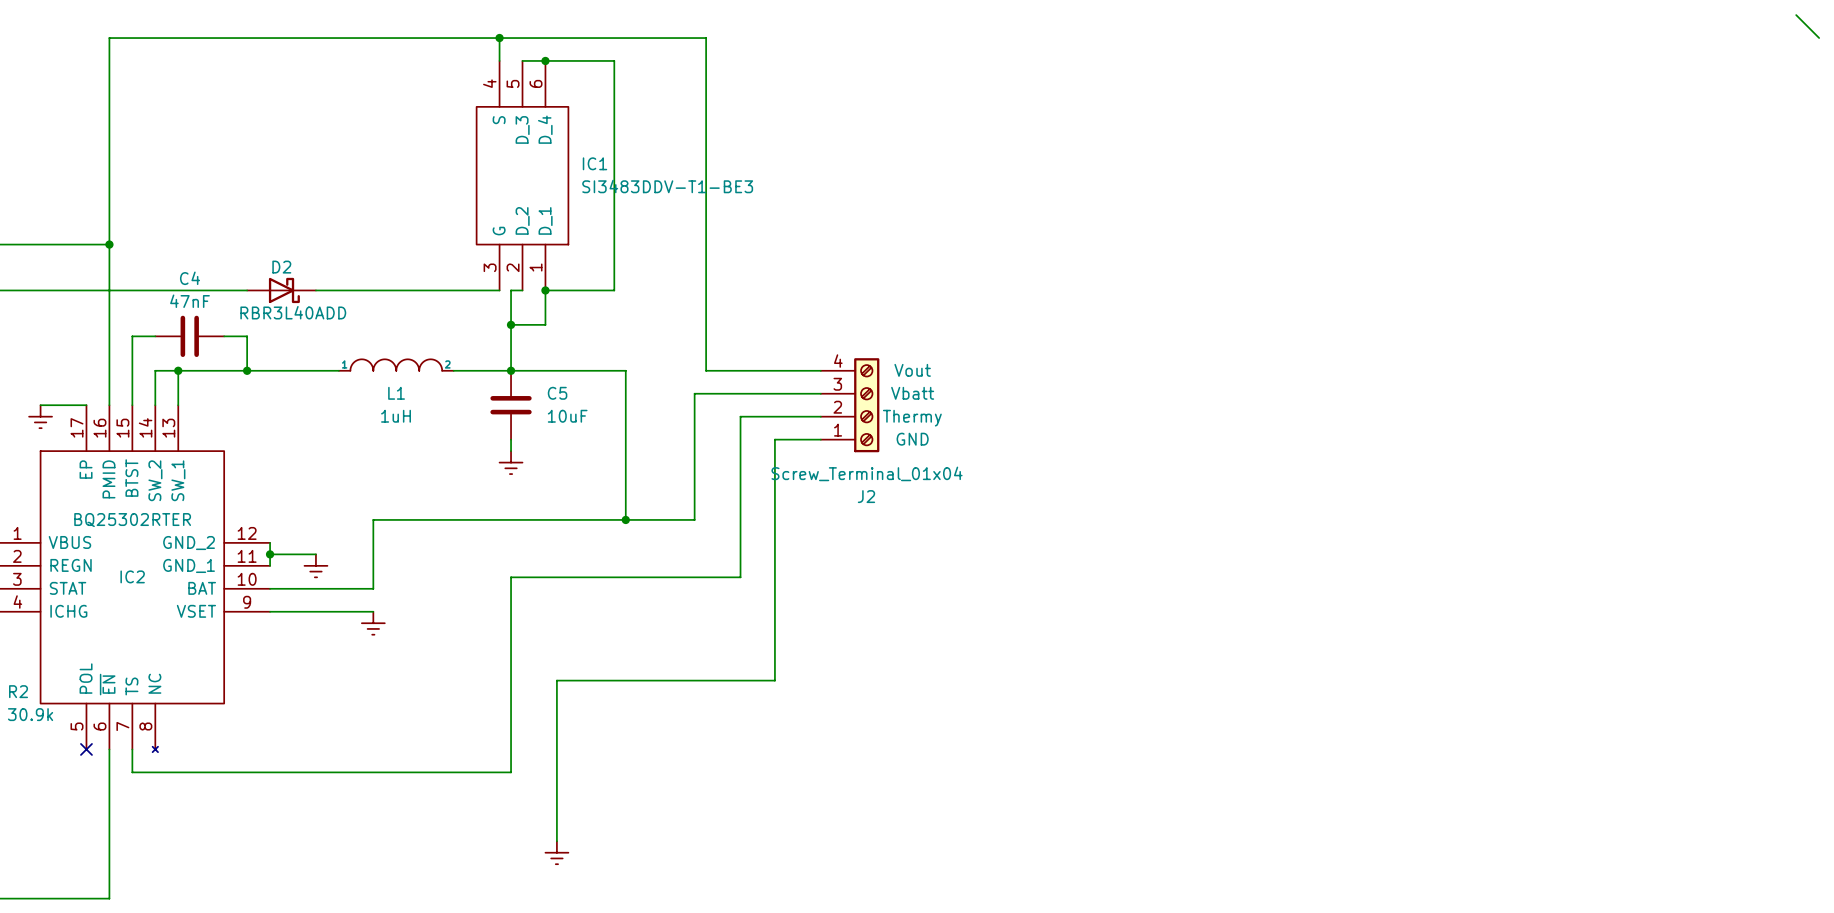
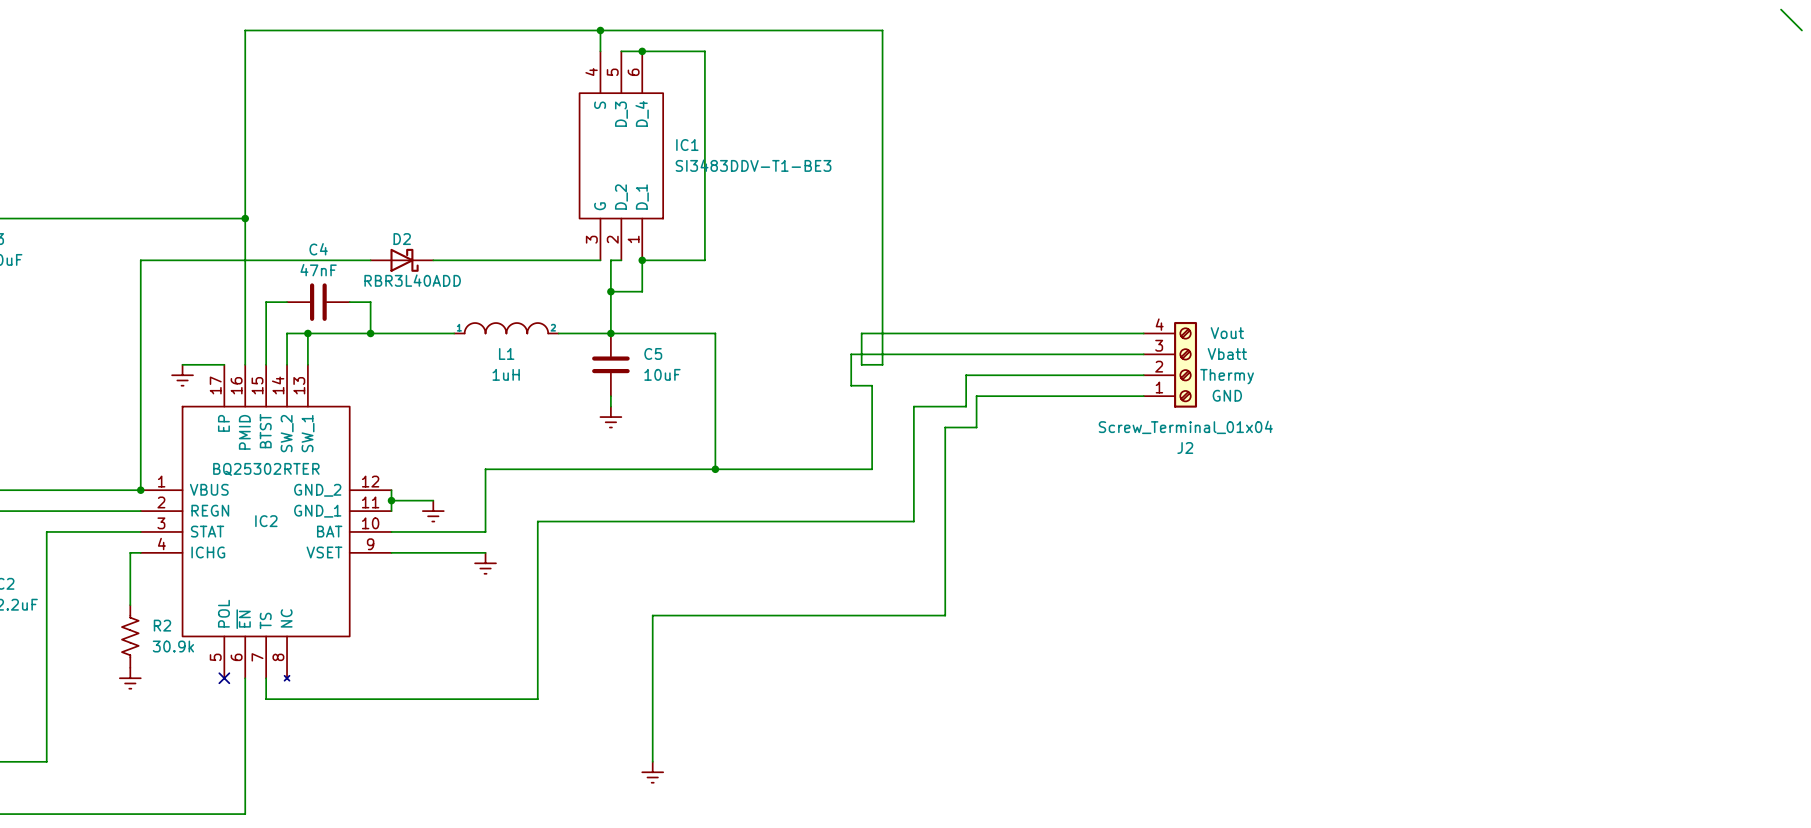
wire: (706, 38) (706, 370) (786, 370) -> (788, 30) (882, 30) (882, 364) (861, 364) (861, 333)
wire: none -> (893, 333) (1143, 333)
wire: (774, 393) (694, 393) (694, 519) -> (851, 354) (851, 385) (872, 385) (872, 469) (778, 469)
wire: none -> (893, 354) (1143, 354)
J2 position: (850, 405) -> (1170, 364)
wire: (820, 416) (740, 416) (740, 577) -> (1143, 375) (966, 375) (966, 406) (913, 406) (913, 521) (819, 521)
wire: (820, 439) (774, 439) (774, 680) -> (1143, 396) (976, 396) (976, 427) (945, 427) (945, 615) (851, 615)
wire: (511, 577) (511, 772) (430, 772) -> (610, 521) (537, 521) (537, 699)

